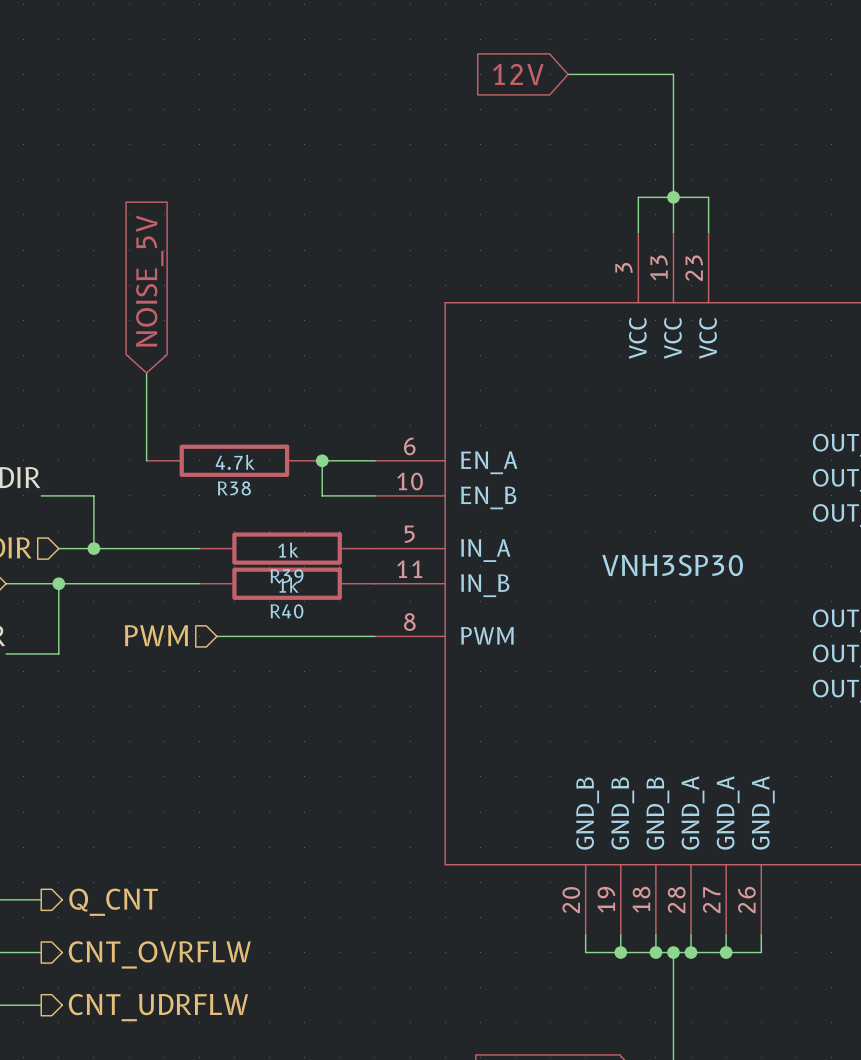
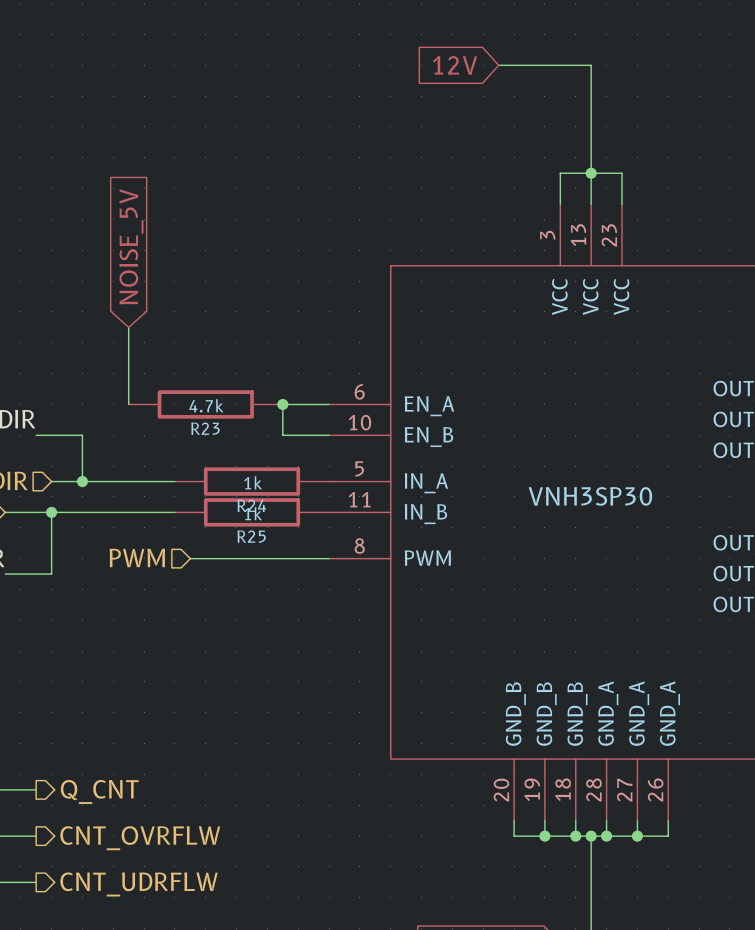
R38 name: R38 (234, 488) -> R23 (205, 428)
R39 name: R39 (286, 576) -> R24 (251, 505)
R40 name: R40 (286, 611) -> R25 (251, 536)

